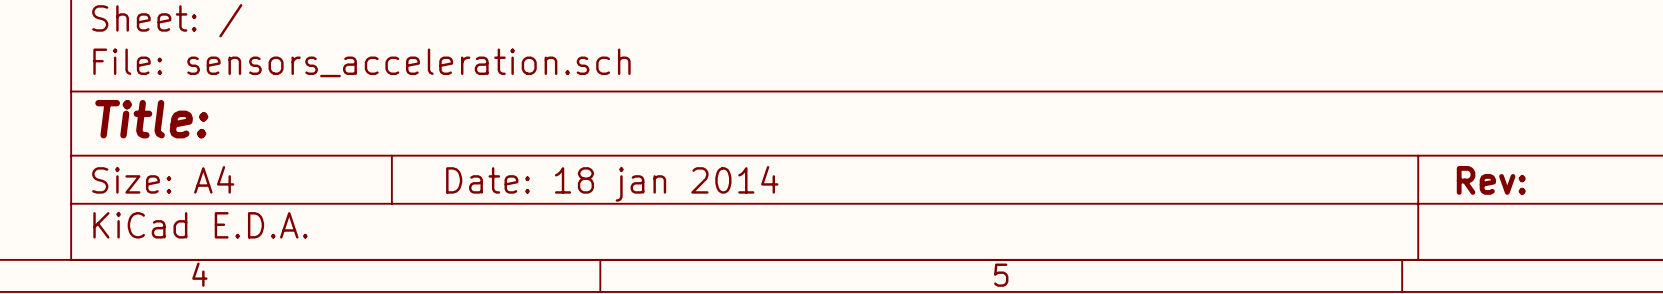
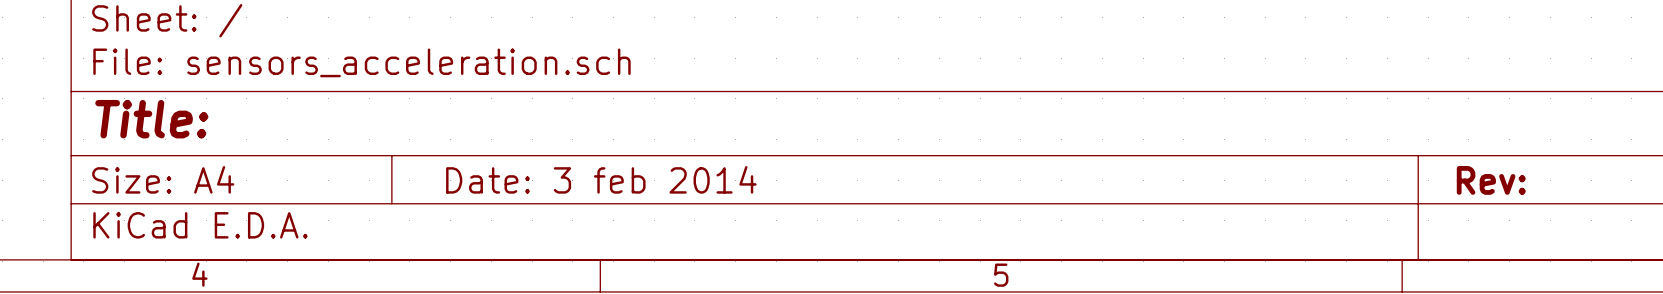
title block: Date: 18 jan 2014 (612, 183) -> Date: 3 feb 2014 (601, 179)

